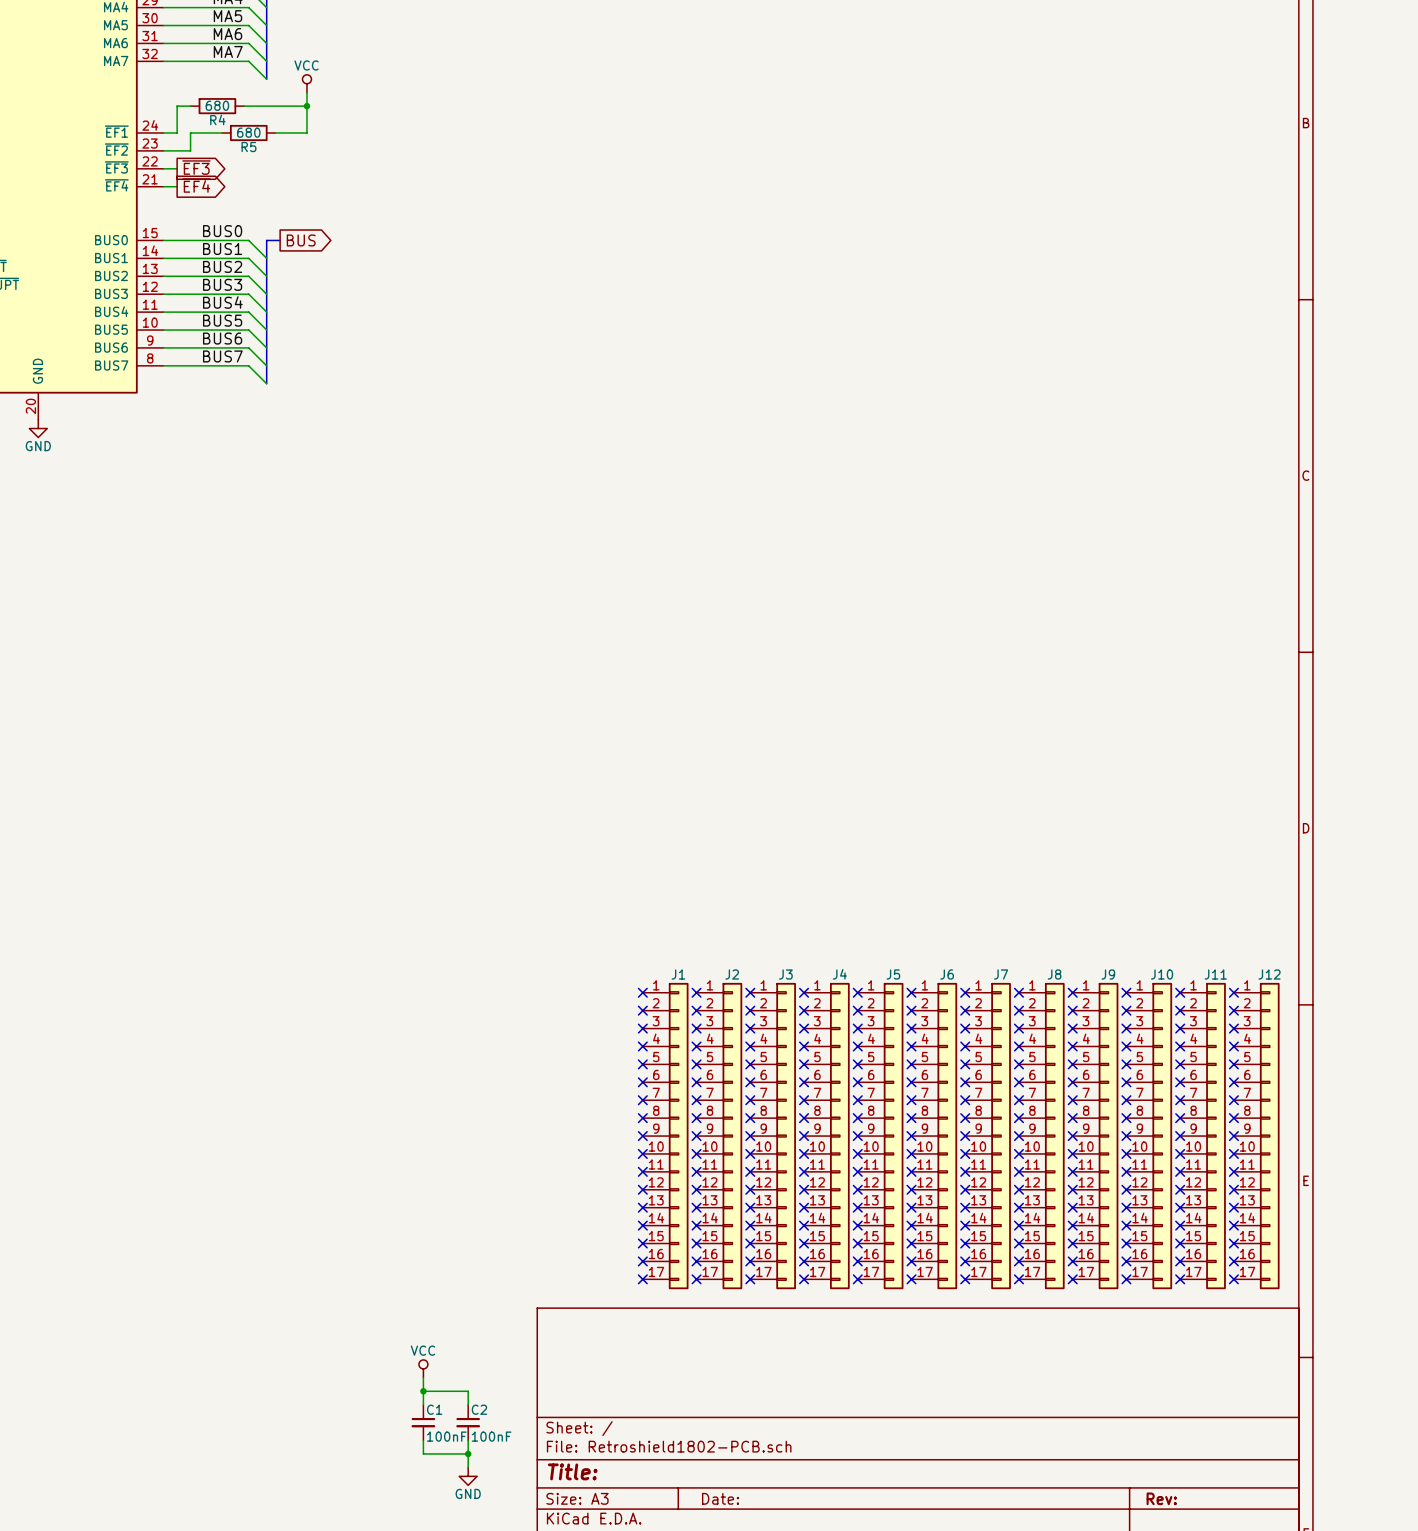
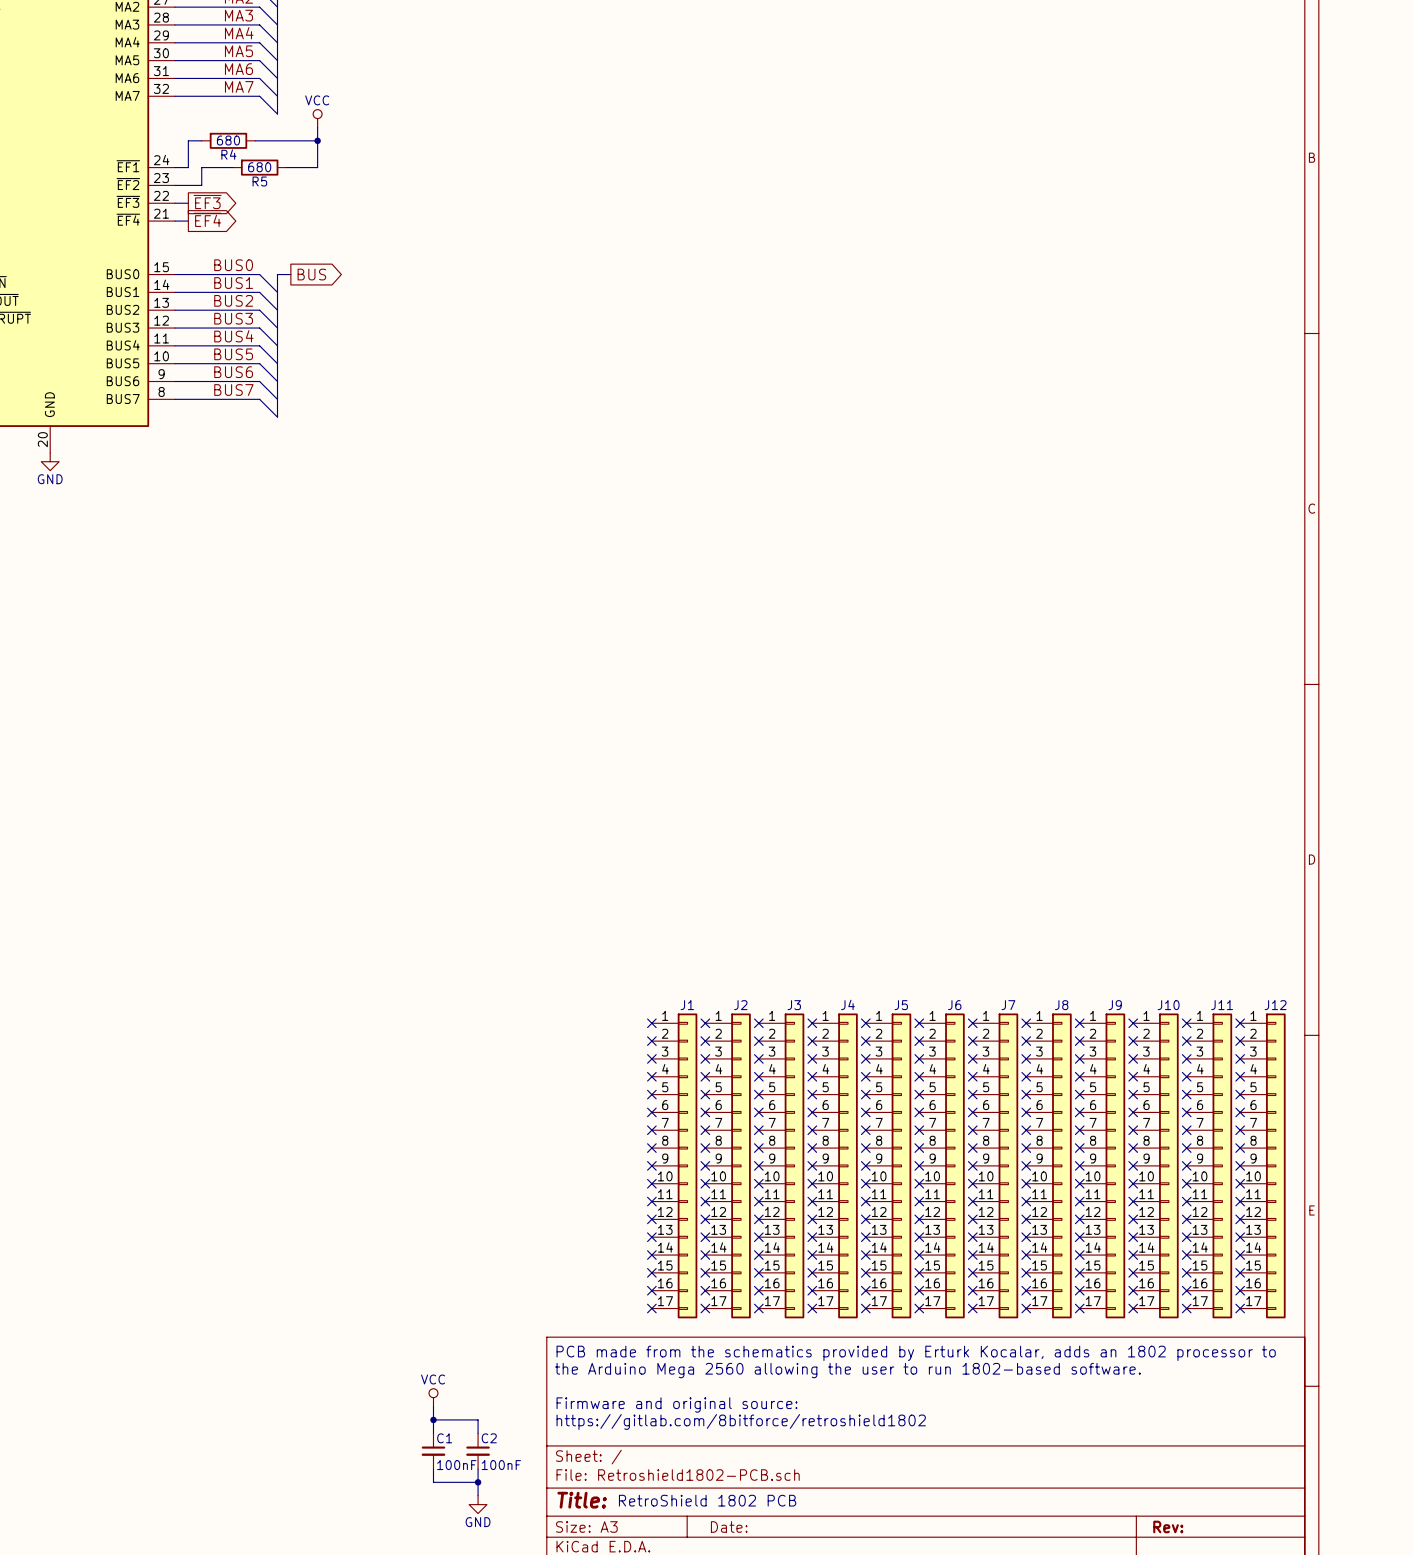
text: none -> PCB made from the schematics provided by Erturk Kocalar, adds an 1802 processor to (916, 1353)
text: none -> the Arduino Mega 2560 allowing the user to run 1802-based software. (847, 1370)
text: none -> Firmware and original source: (677, 1405)
text: none -> https://gitlab.com/8bitforce/retroshield1802 (741, 1421)
text: none -> RetroShield 1802 PCB (707, 1500)

